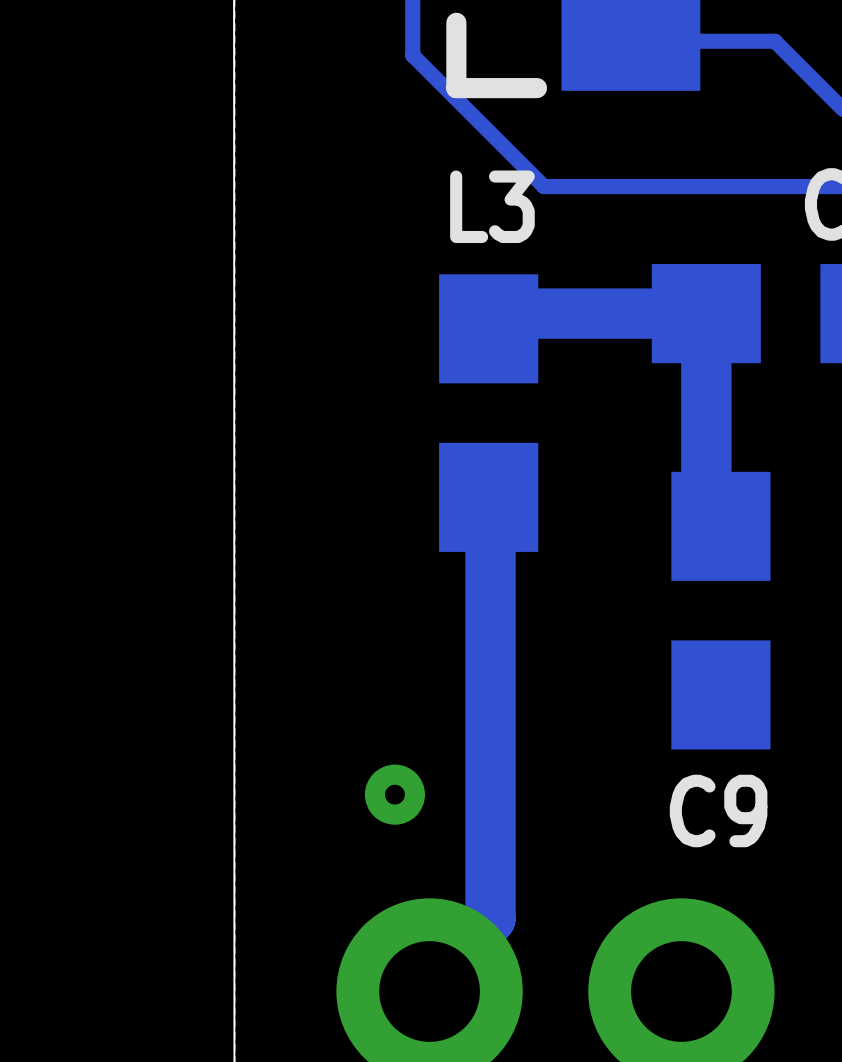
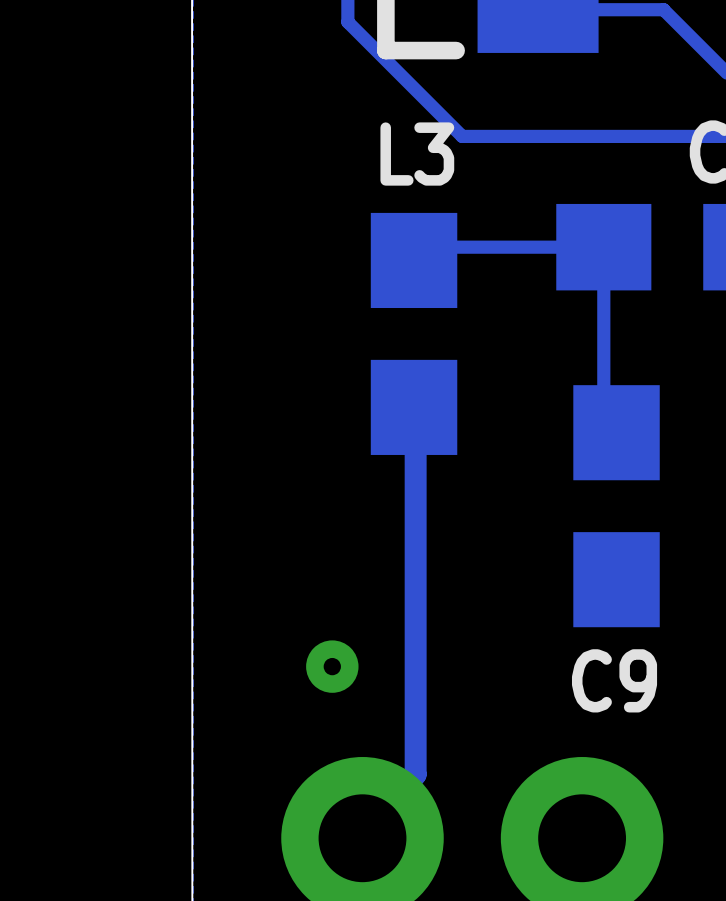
track width: thick (503, 313) (706, 313) (706, 511) -> thin (427, 247) (603, 247) (603, 419)
track width: thick (490, 499) (490, 918) (429, 991) -> thin (415, 409) (415, 774) (362, 838)

